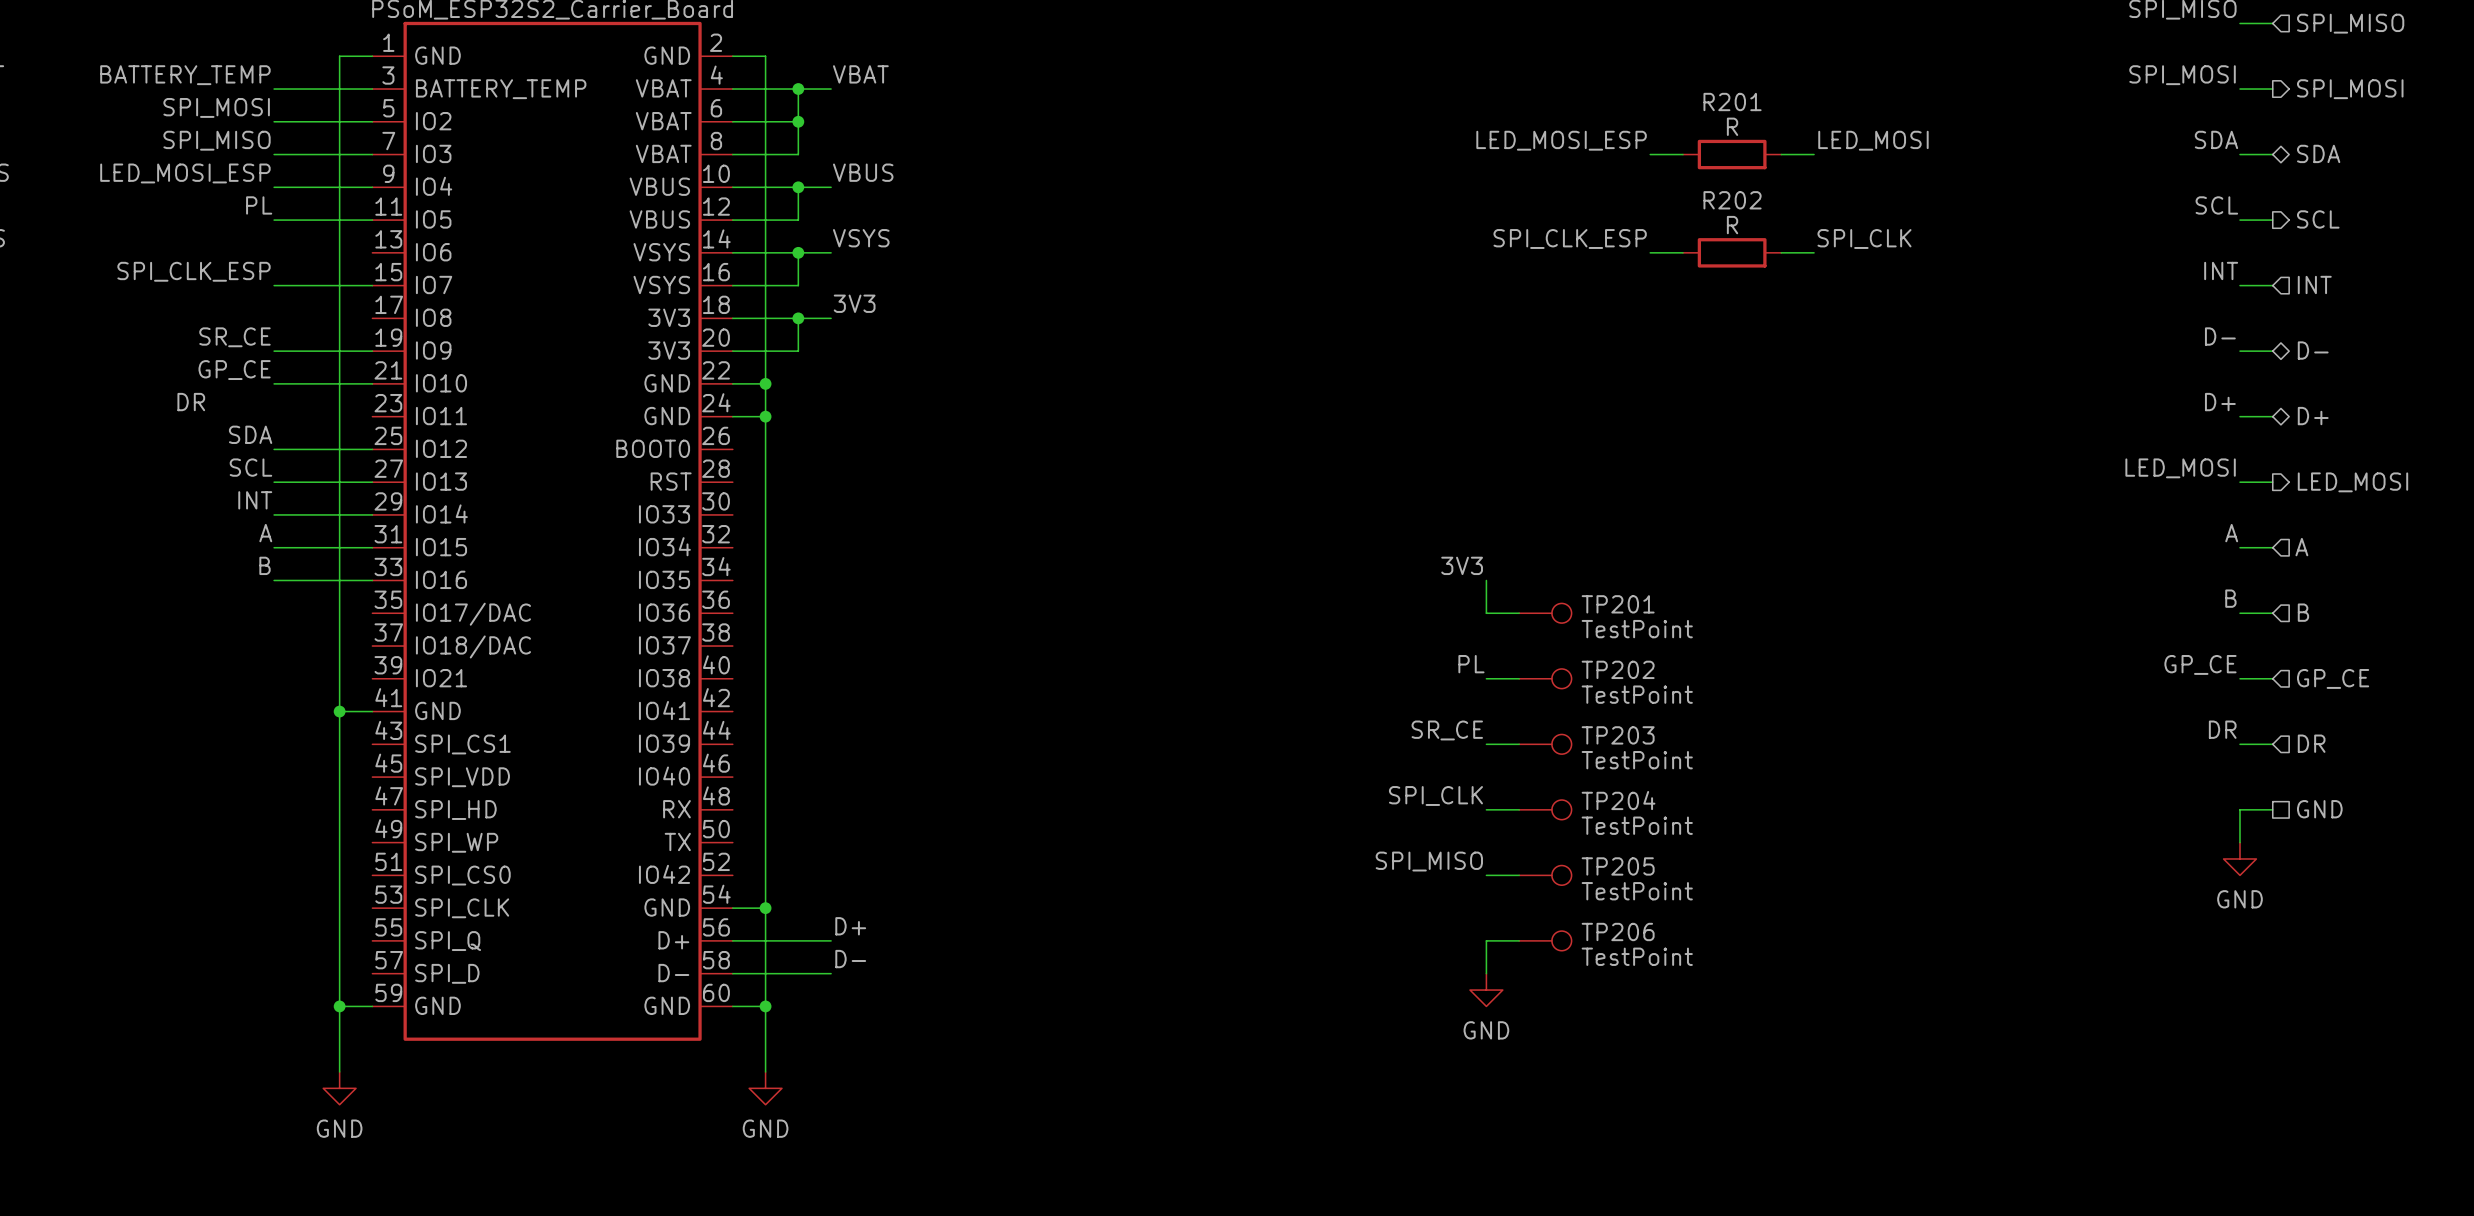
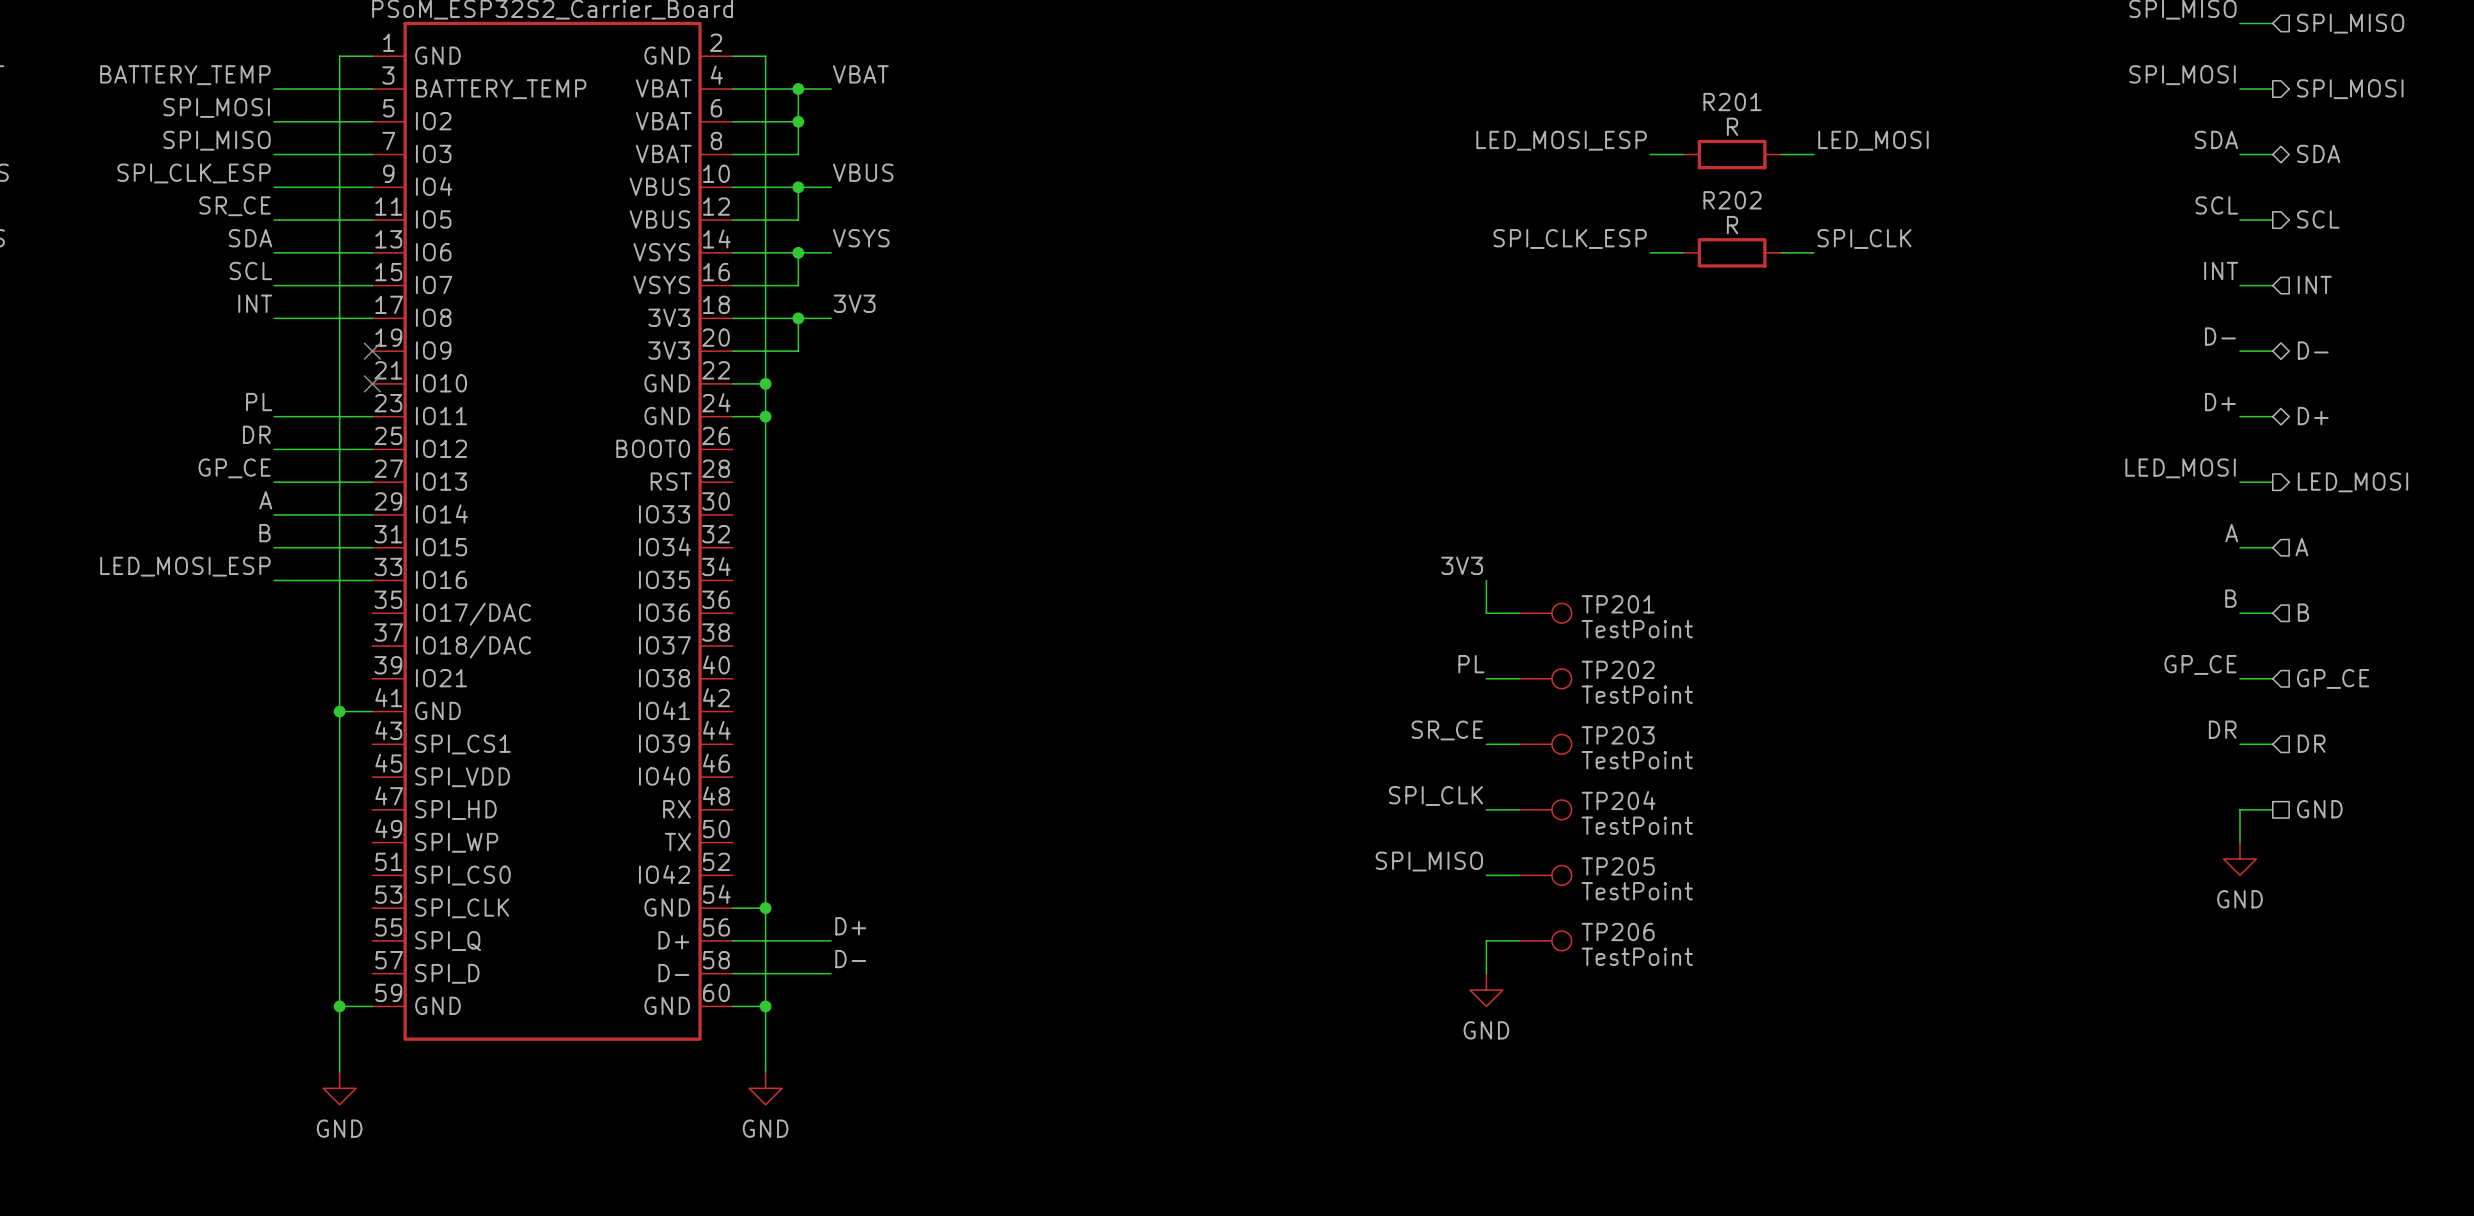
label: LED_MOSI_ESP (185, 173) -> SPI_CLK_ESP (194, 173)
label: PL (259, 205) -> SR_CE (234, 206)
label: none -> SDA (250, 238)
wire: none -> (274, 252) (372, 252)
label: SPI_CLK_ESP (194, 271) -> SCL (250, 270)
label: none -> INT (255, 303)
label: SR_CE (234, 337) -> none
wire: (274, 351) (372, 351) -> (274, 318) (372, 318)
no-connect mark: none -> (372, 351)
label: GP_CE (234, 370) -> none
wire: (274, 383) (372, 383) -> (274, 416) (372, 416)
no-connect mark: none -> (372, 383)
label: DR (191, 402) -> none
label: none -> PL (259, 402)
label: SDA (250, 434) -> DR (256, 434)
label: SCL (250, 467) -> GP_CE (234, 468)
label: INT (255, 500) -> A (265, 500)
label: A (265, 533) -> B (265, 533)
label: B (265, 565) -> LED_MOSI_ESP (185, 566)

